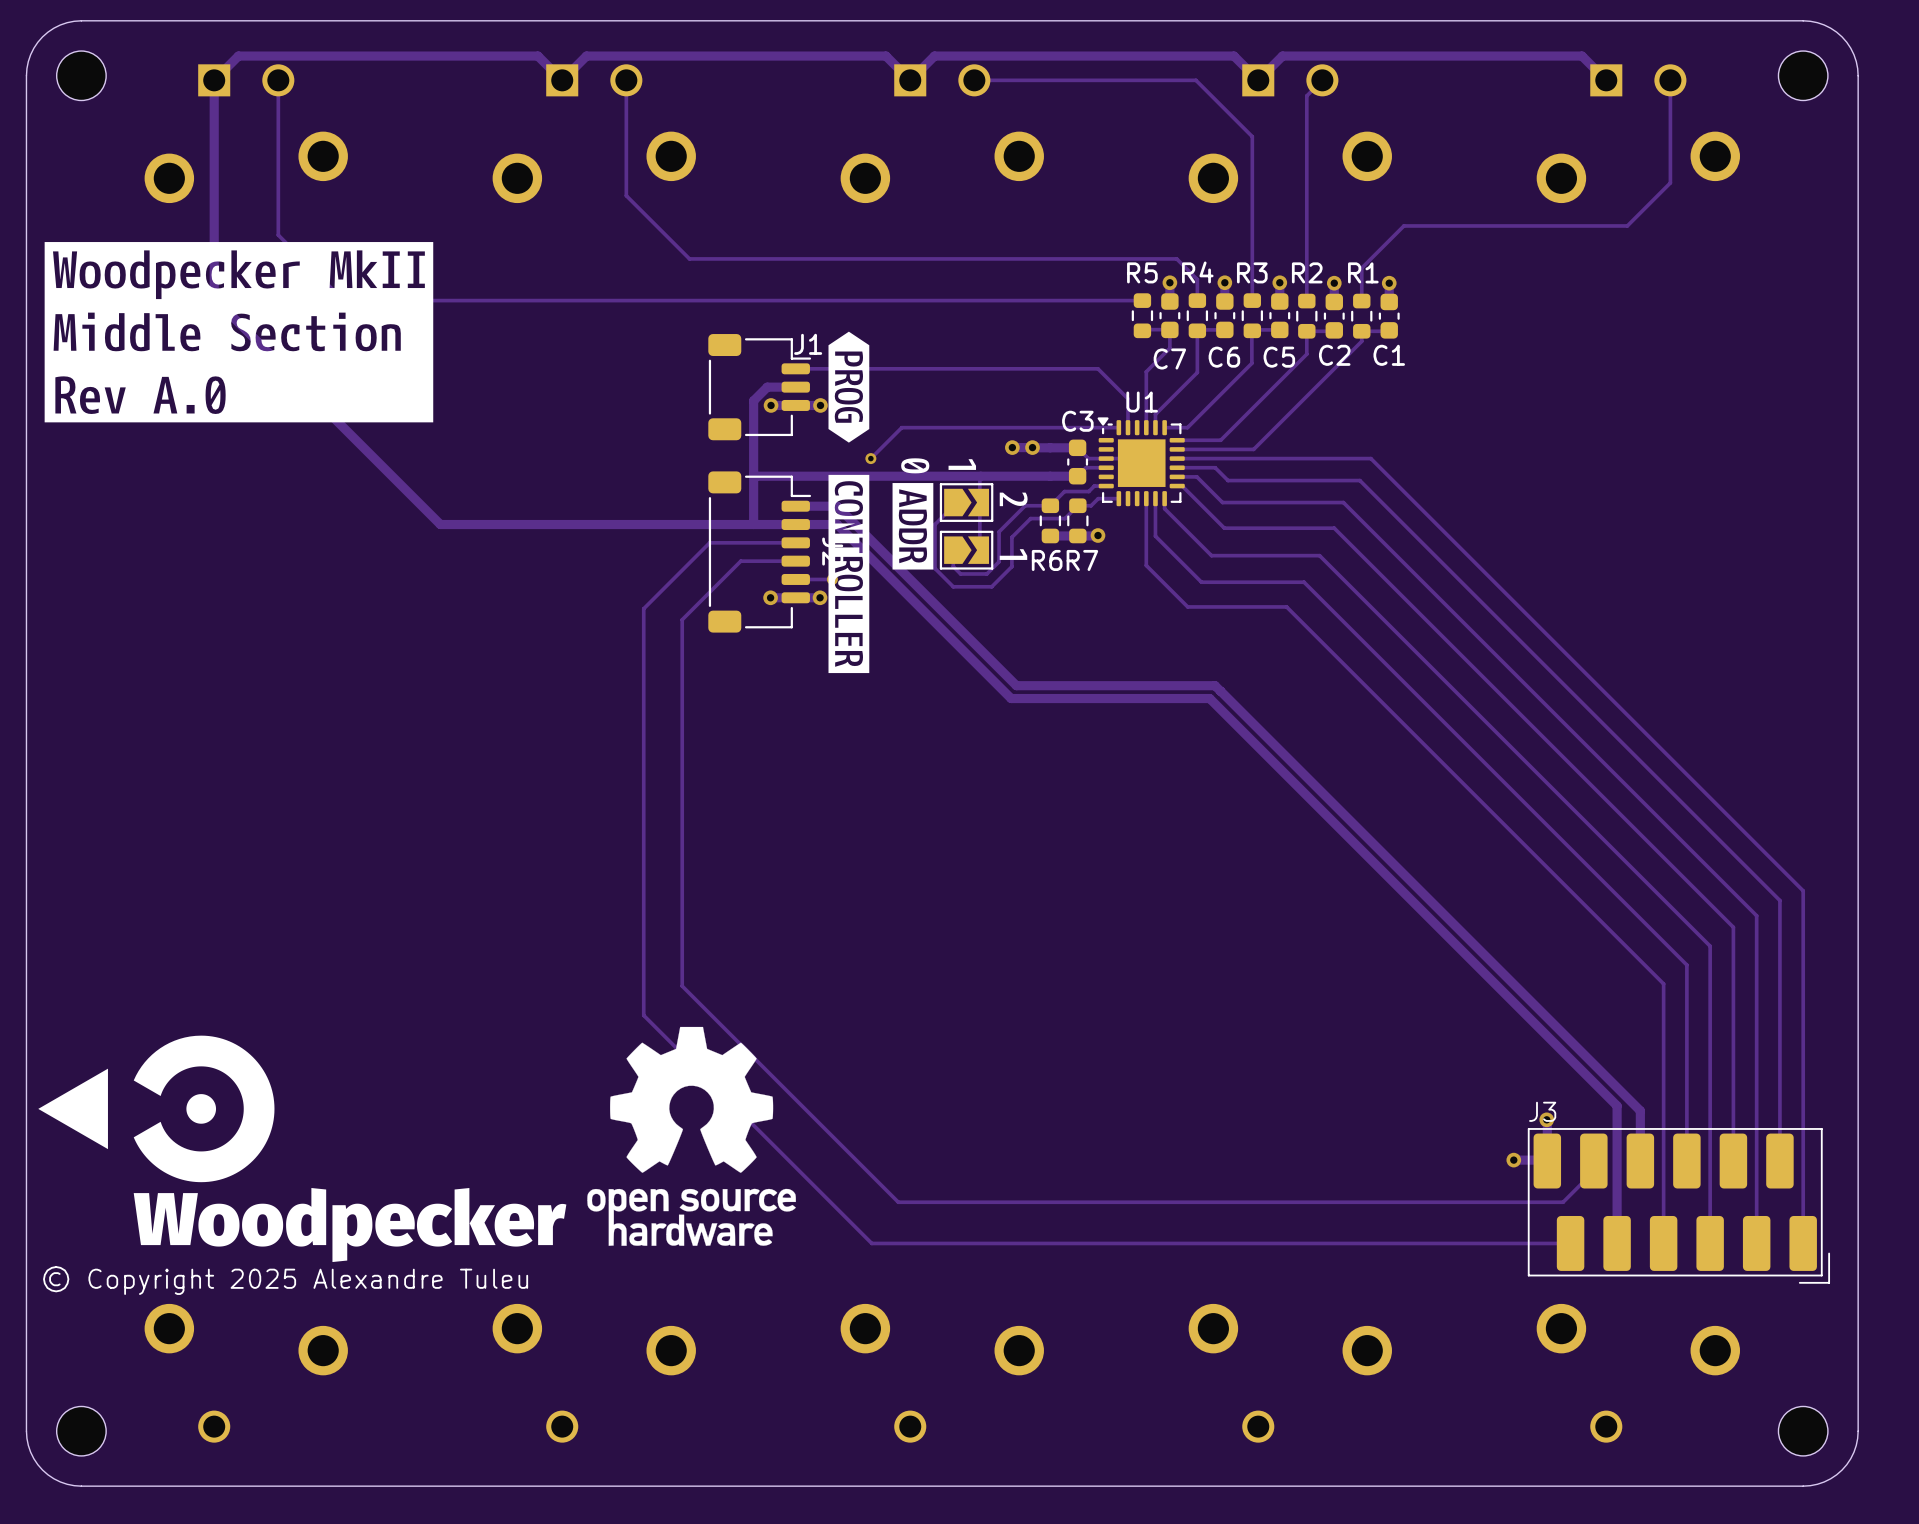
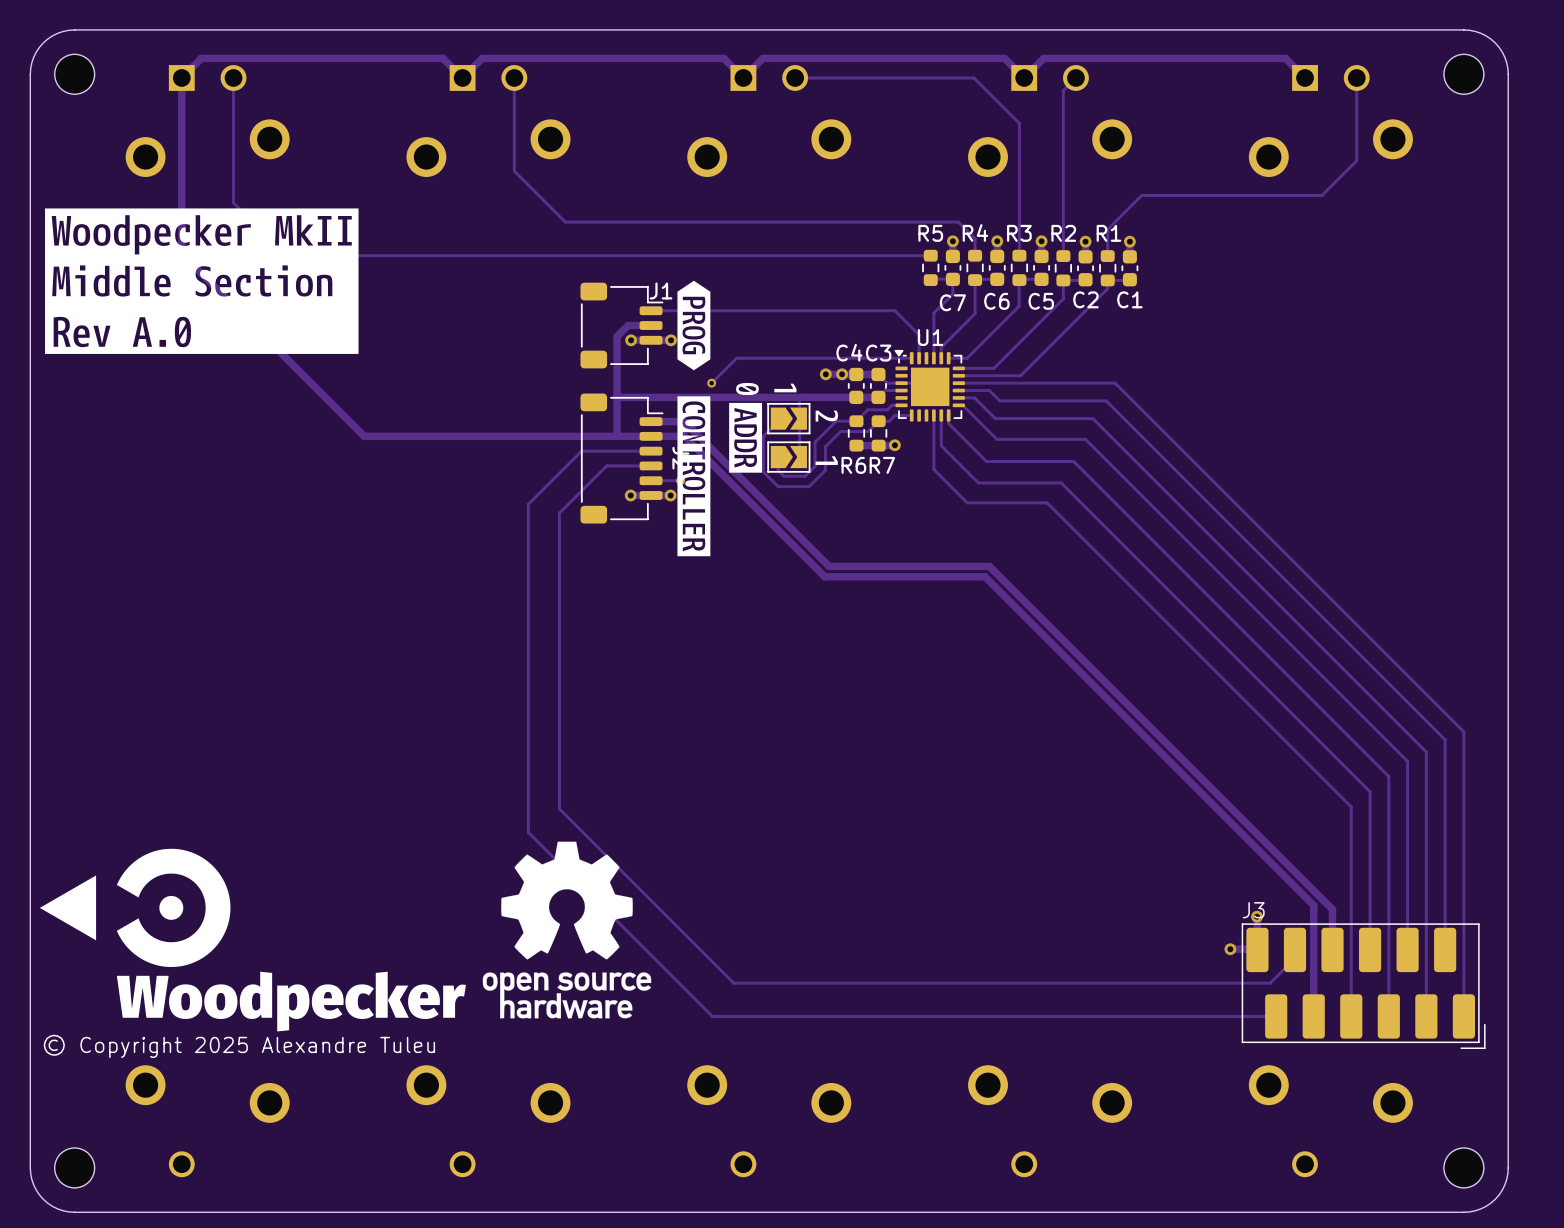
C4: none -> (856, 385)

